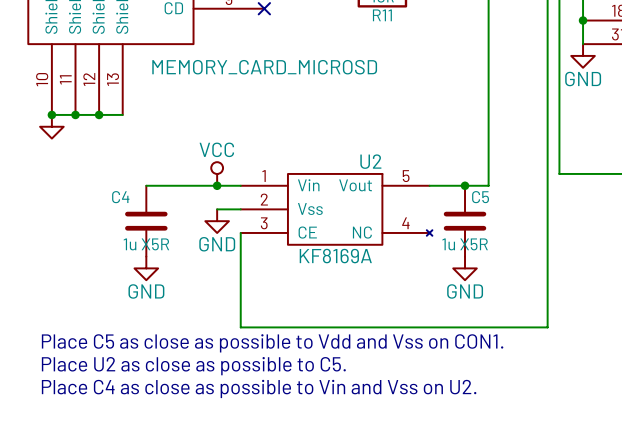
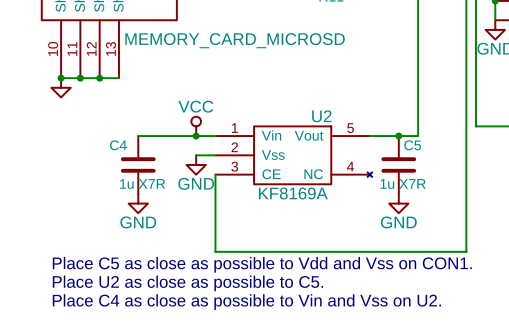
C4 value: 1u X5R (146, 244) -> 1u X7R (142, 183)
C5 value: 1u X5R (465, 244) -> 1u X7R (403, 183)

